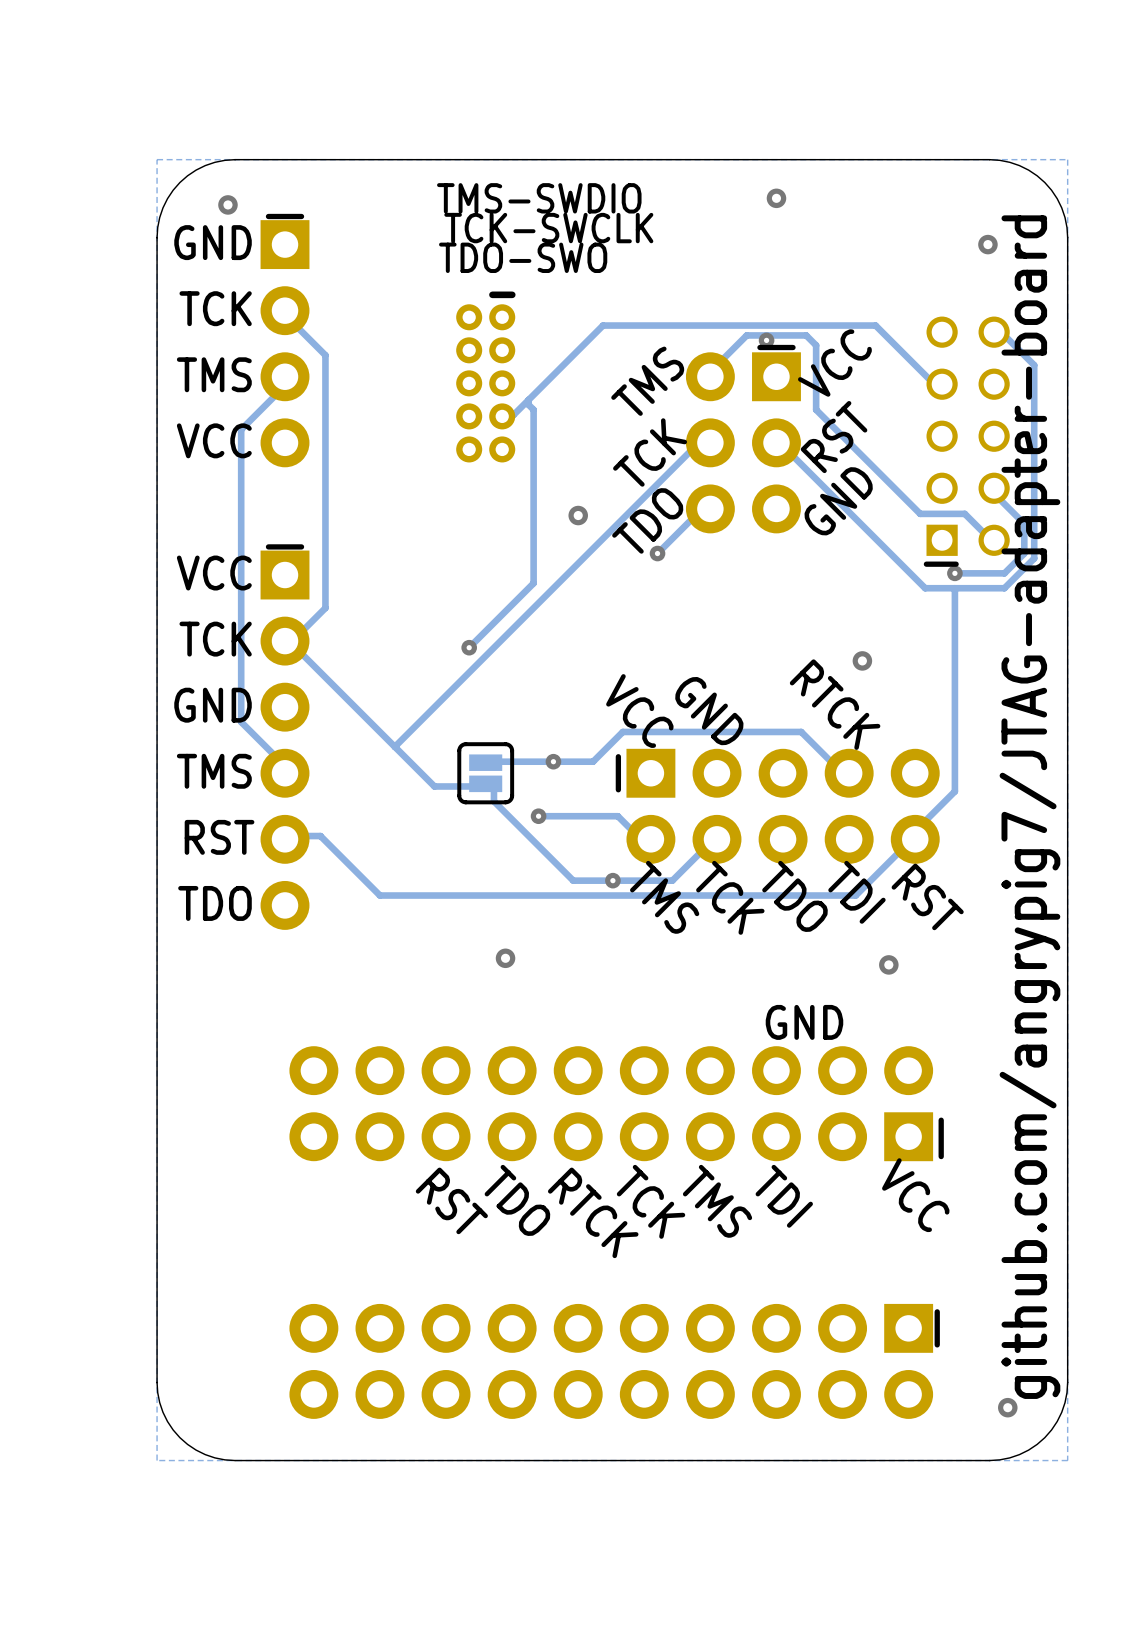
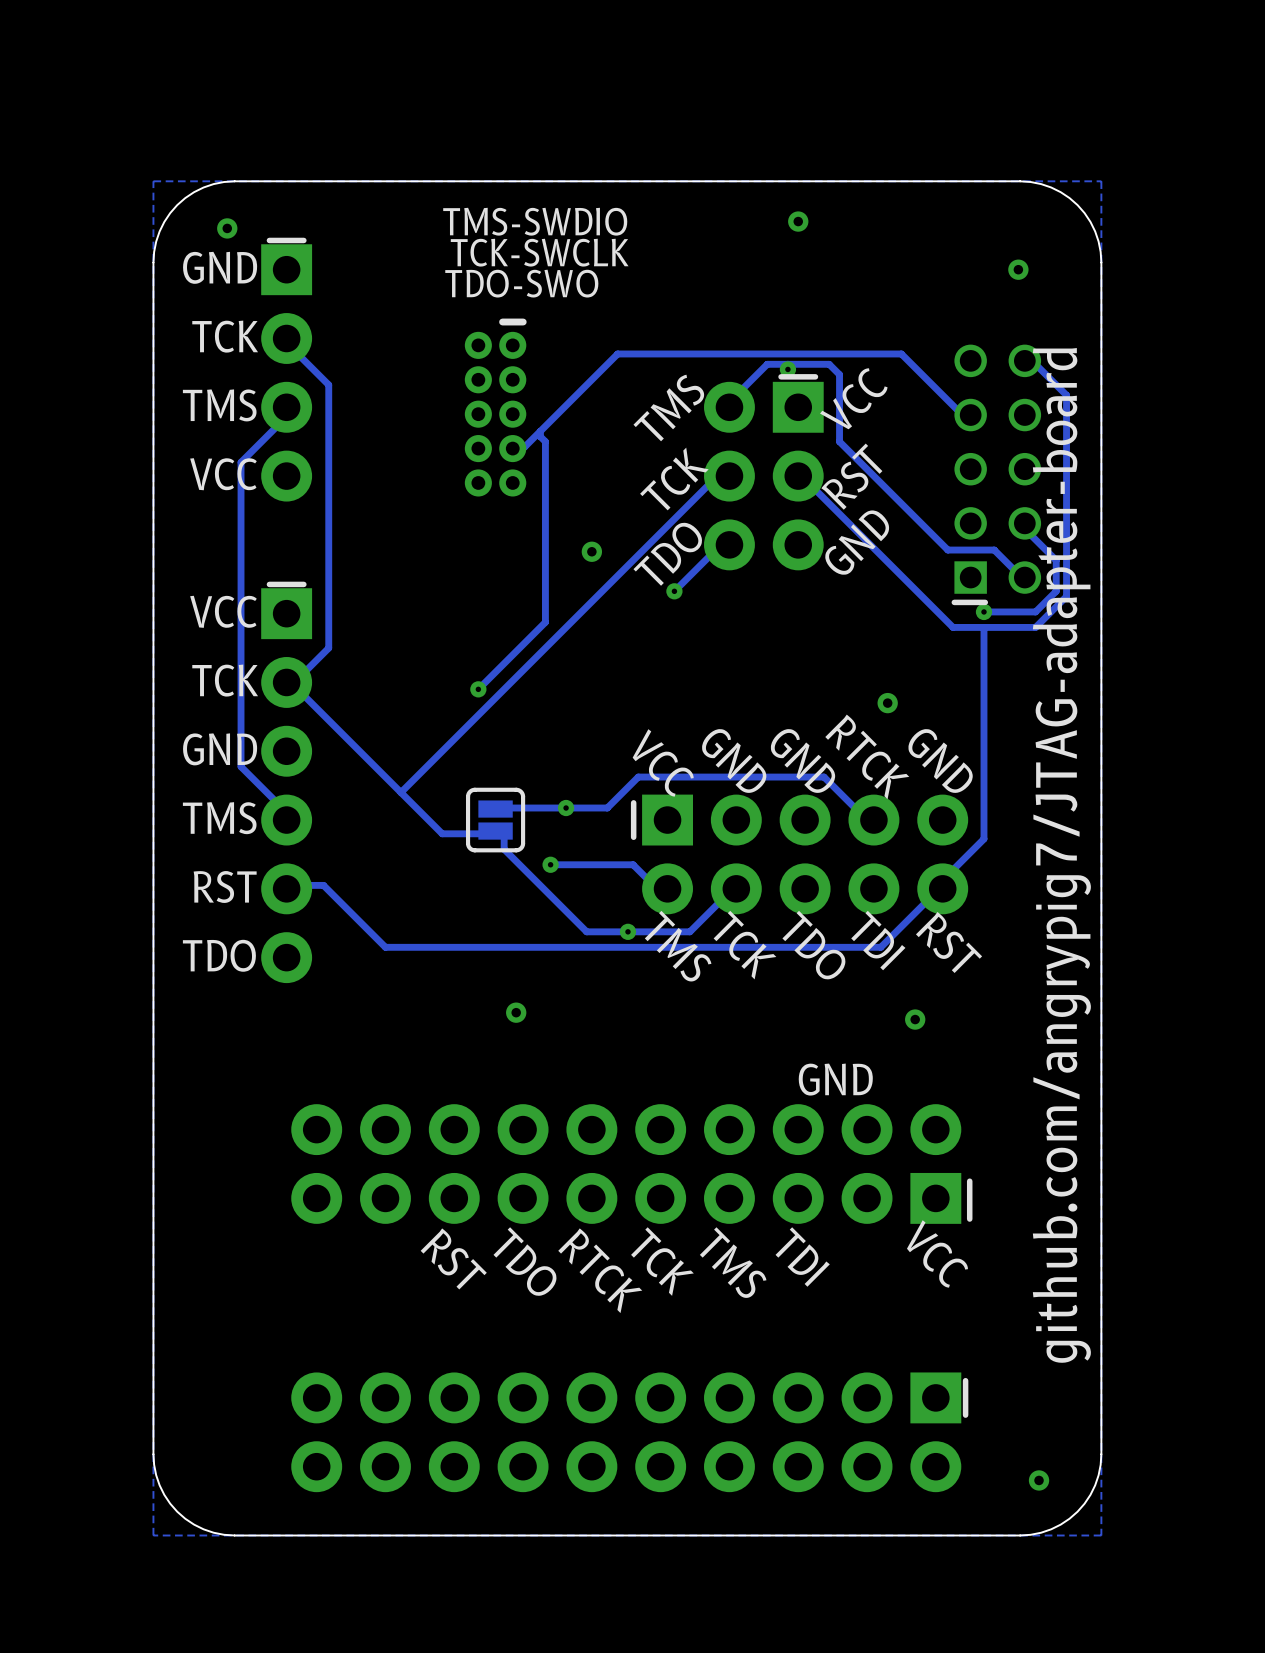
text: none -> GND (802, 760)
text: none -> GND (940, 760)

